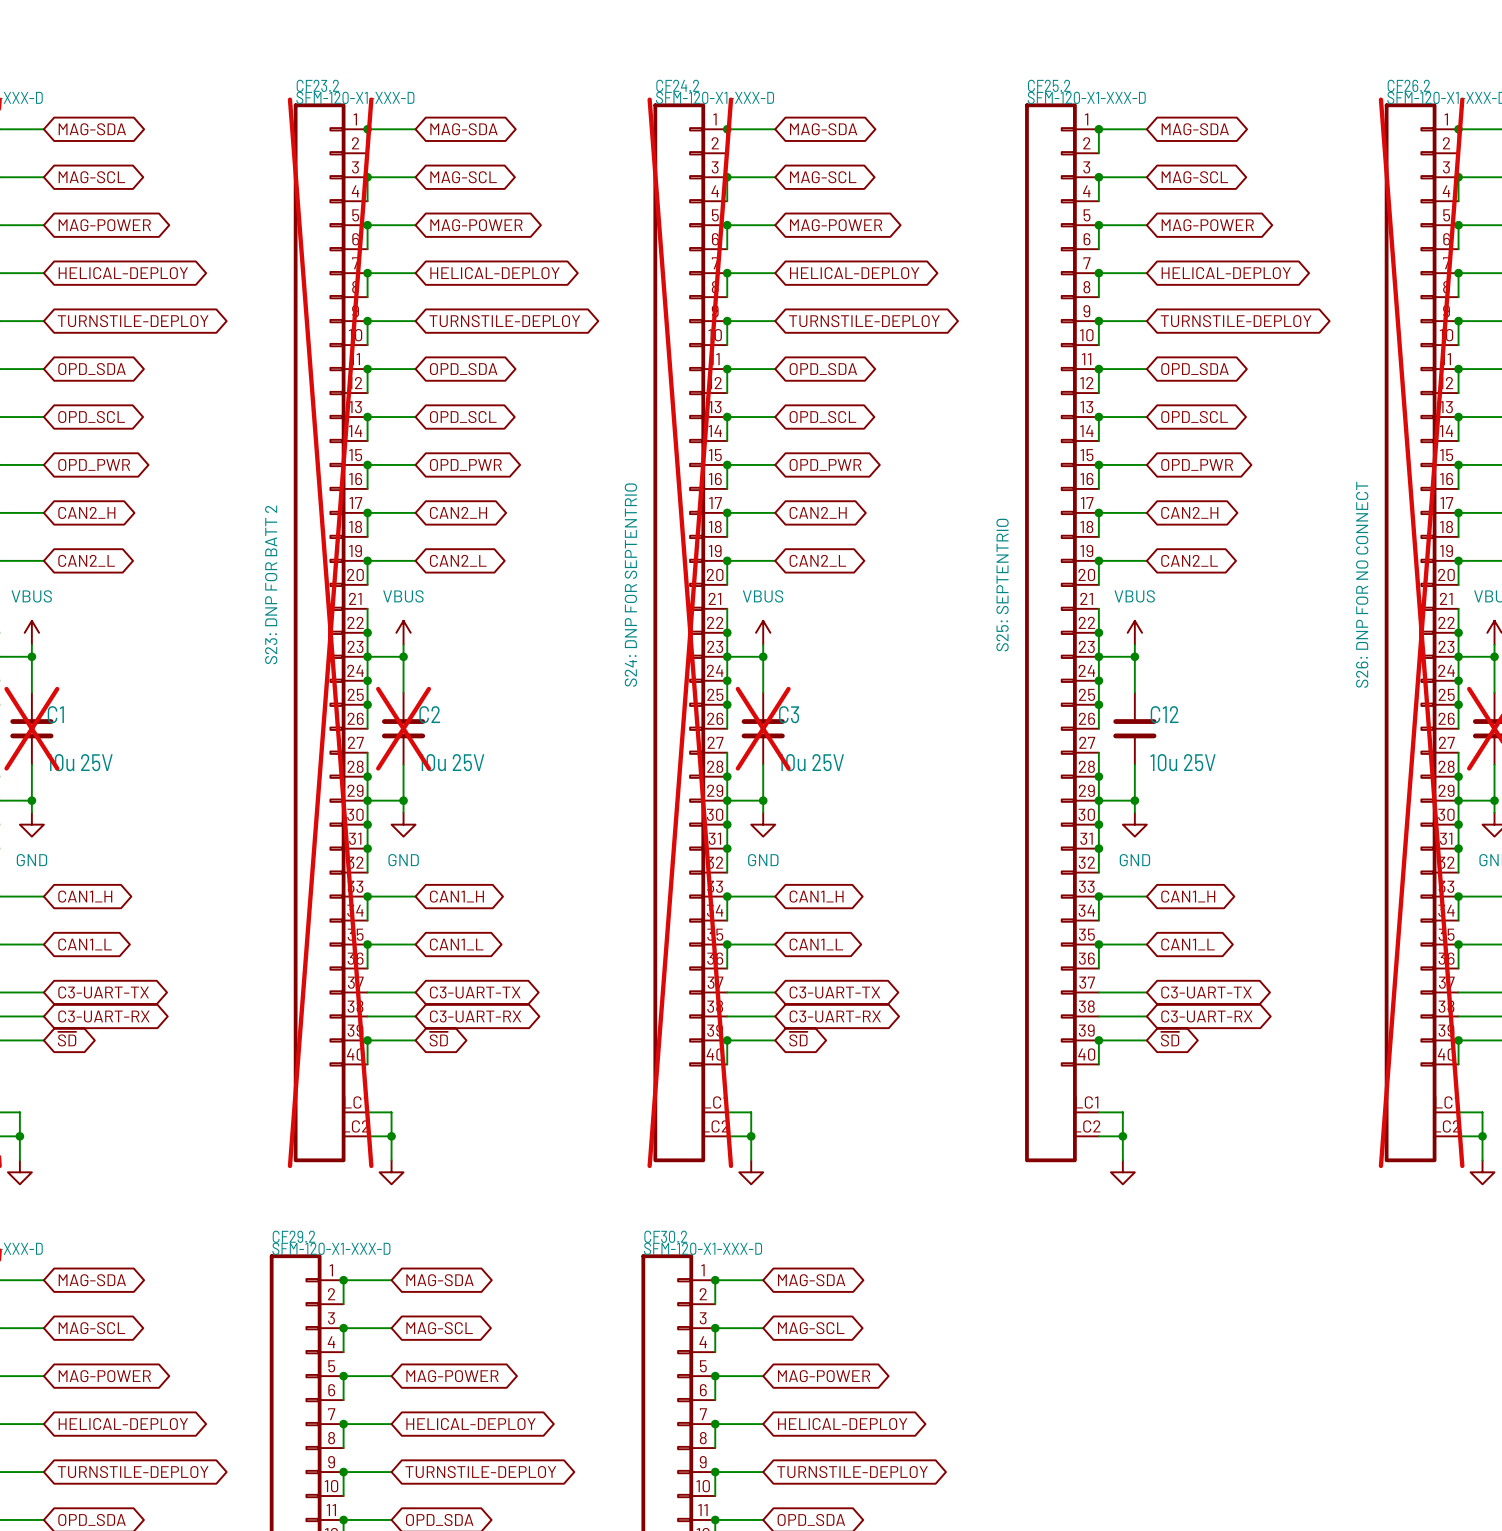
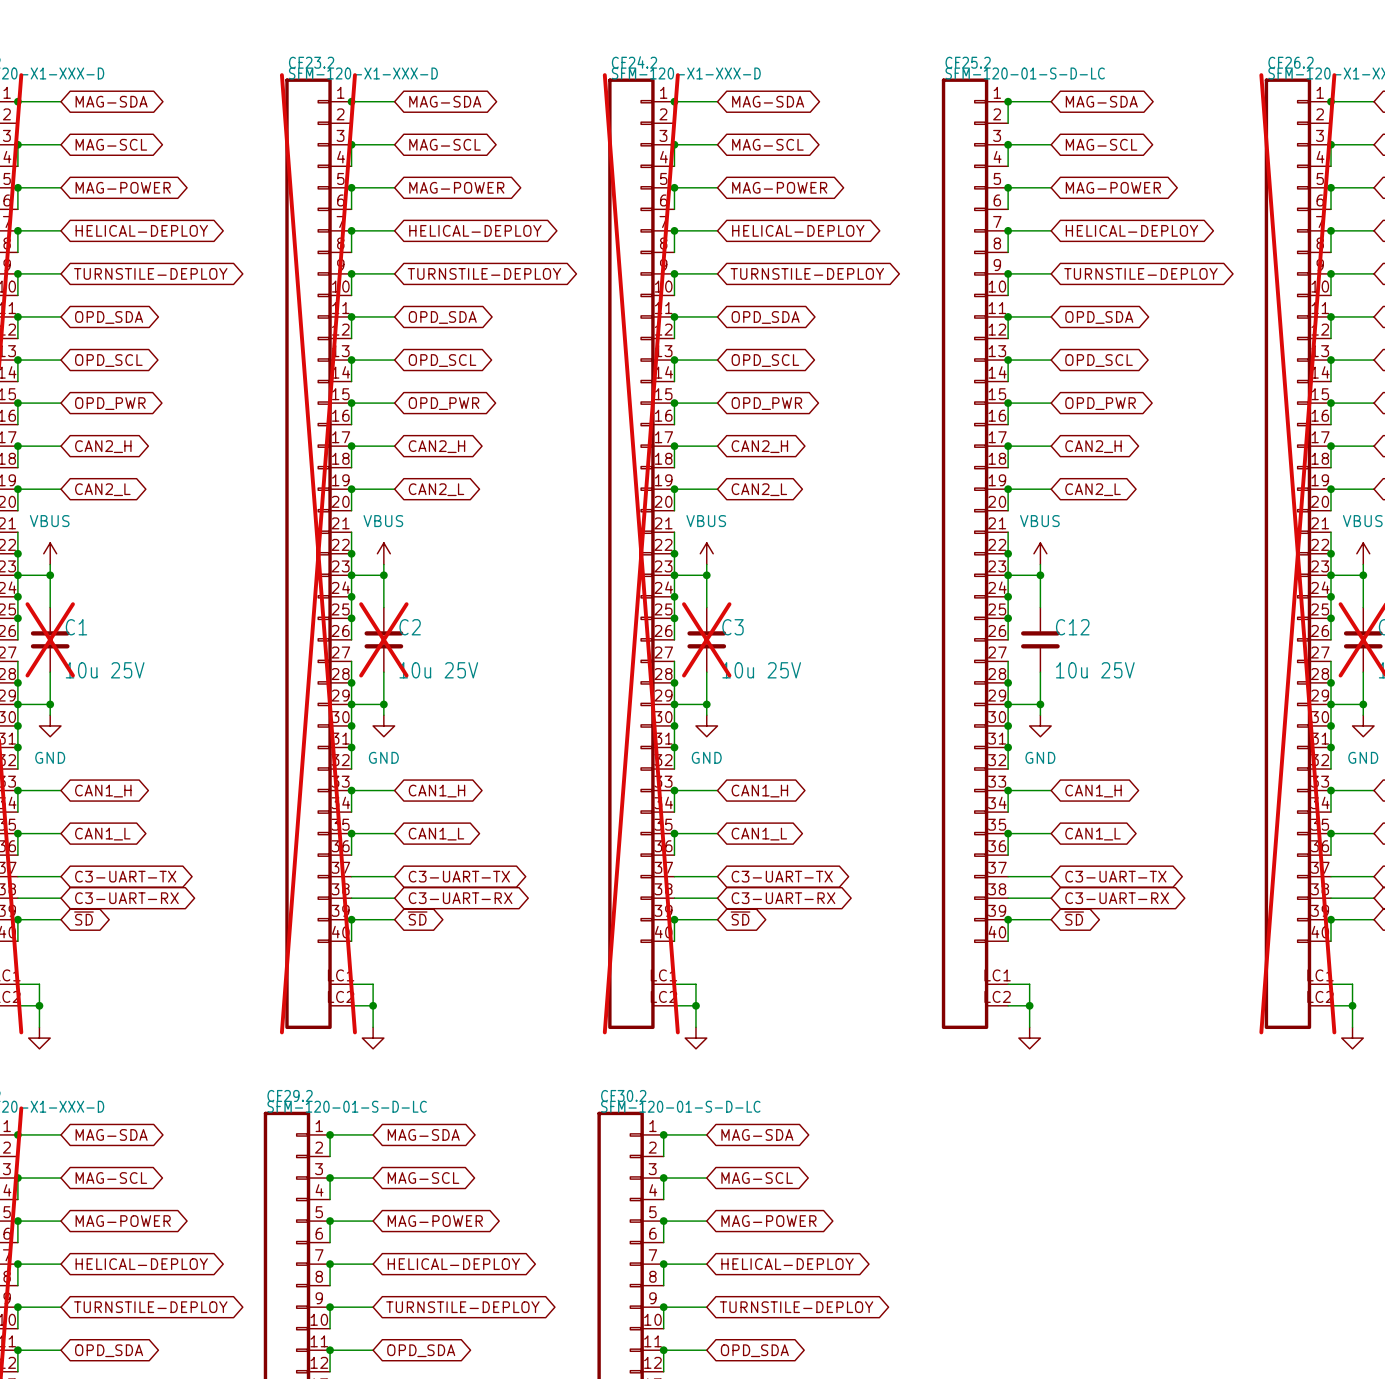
CF25.2 value: SFM-120-X1-XXX-D (1086, 97) -> SFM-120-01-S-D-LC (1025, 73)
CF23.2 text: S23: DNP FOR BATT 2 (271, 584) -> none
CF26.2 text: S26: DNP FOR NO CONNECT (1362, 584) -> none
CF24.2 text: S24: DNP FOR SEPTENTRIO (630, 585) -> none
CF25.2 text: S25: SEPTENTRIO (1002, 585) -> none
CF29.2 value: SFM-120-X1-XXX-D (331, 1248) -> SFM-120-01-S-D-LC (347, 1106)
CF30.2 value: SFM-120-X1-XXX-D (703, 1248) -> SFM-120-01-S-D-LC (680, 1106)

